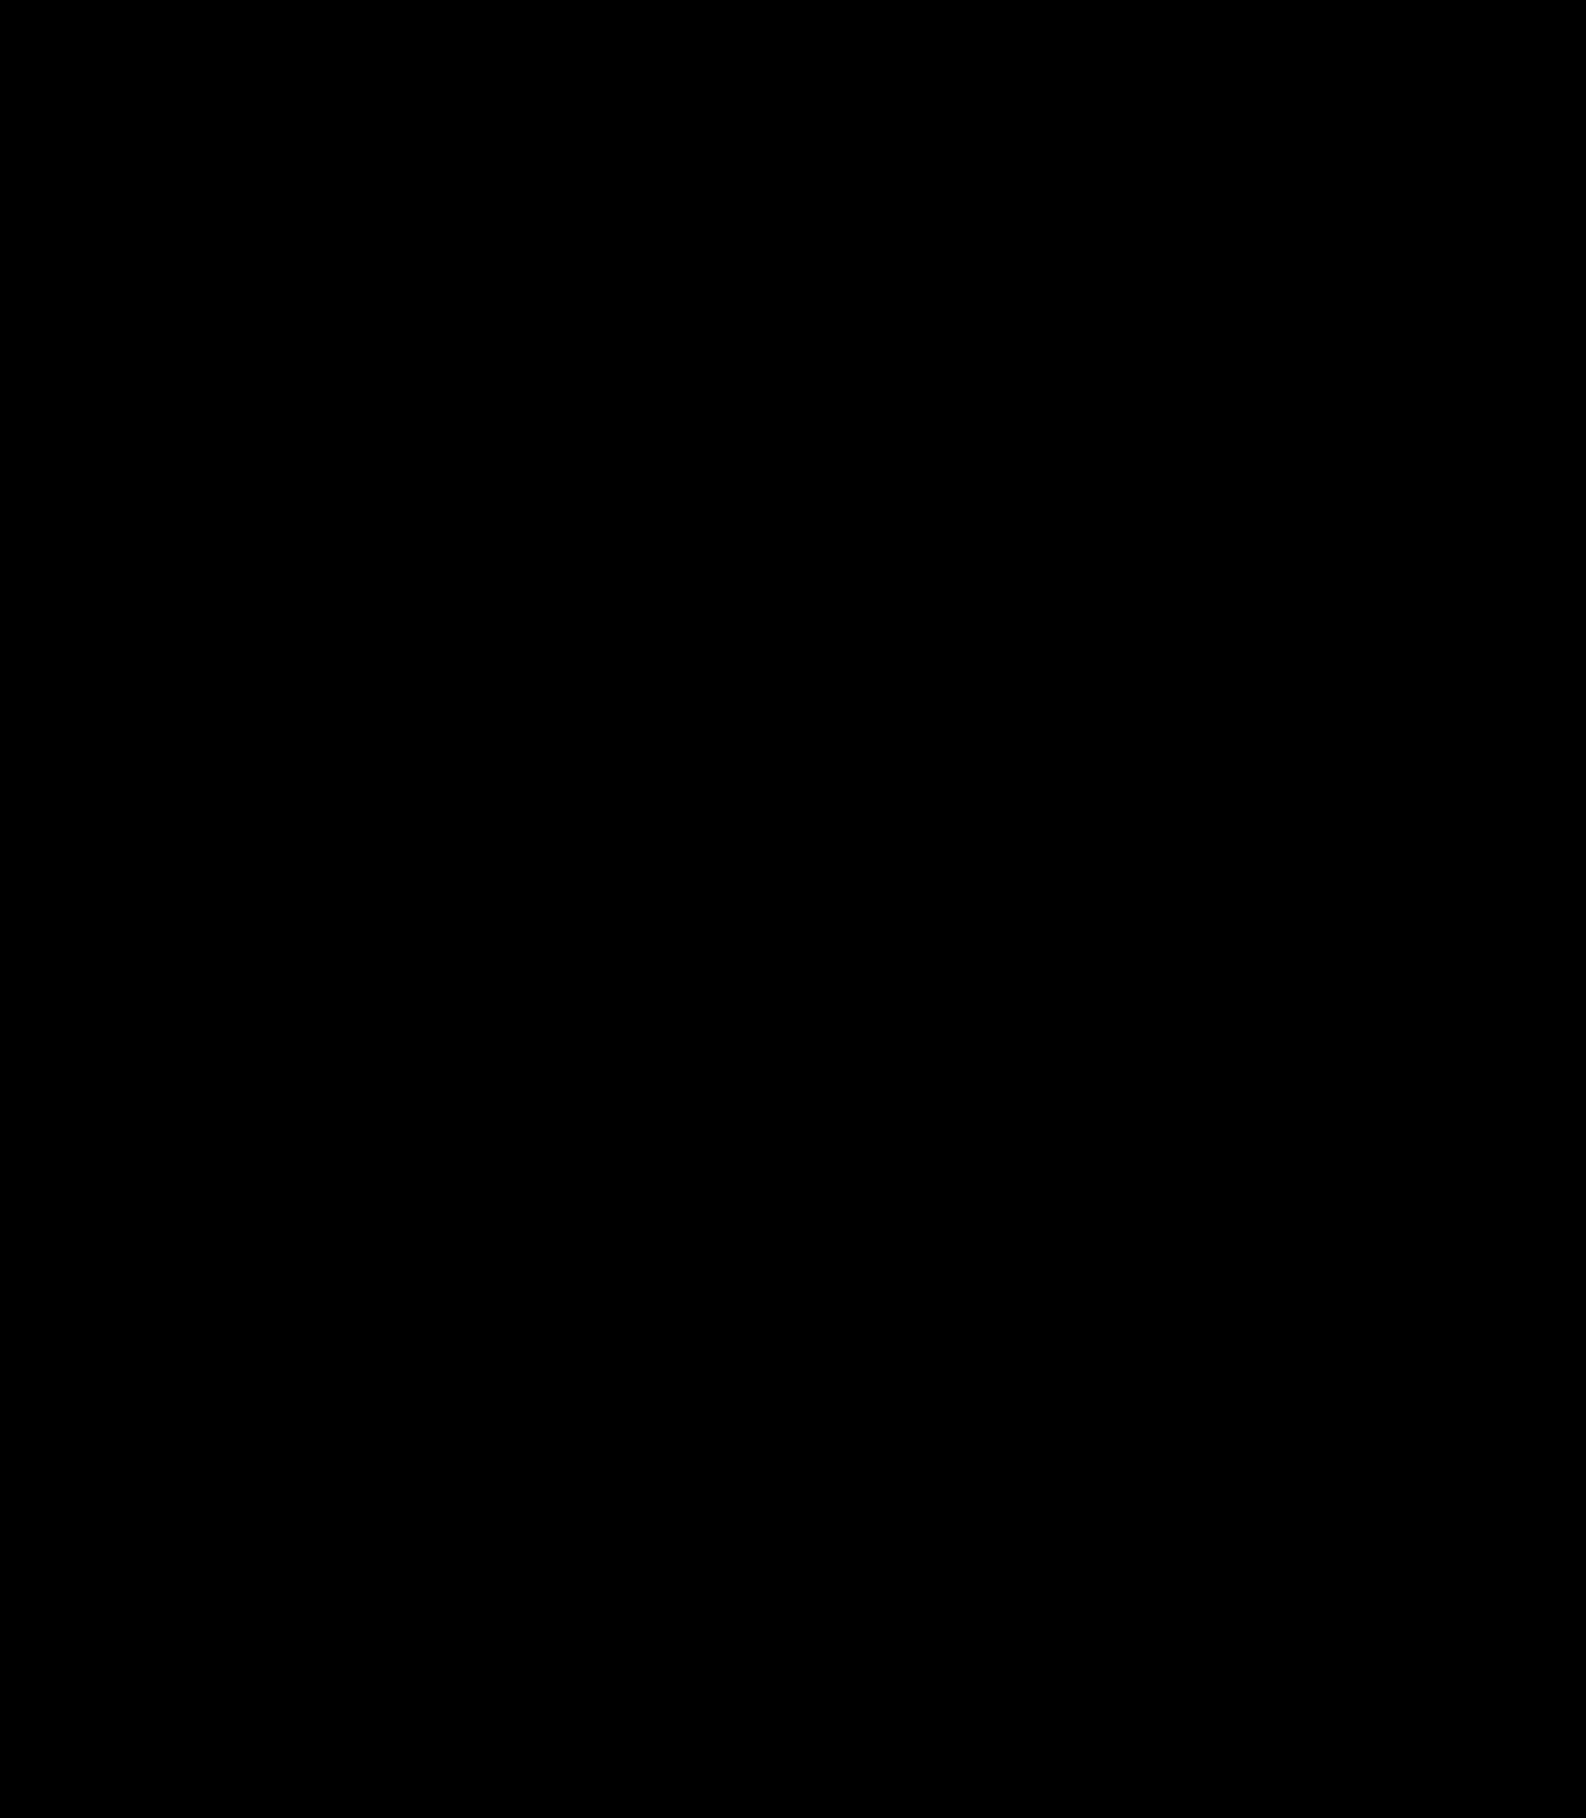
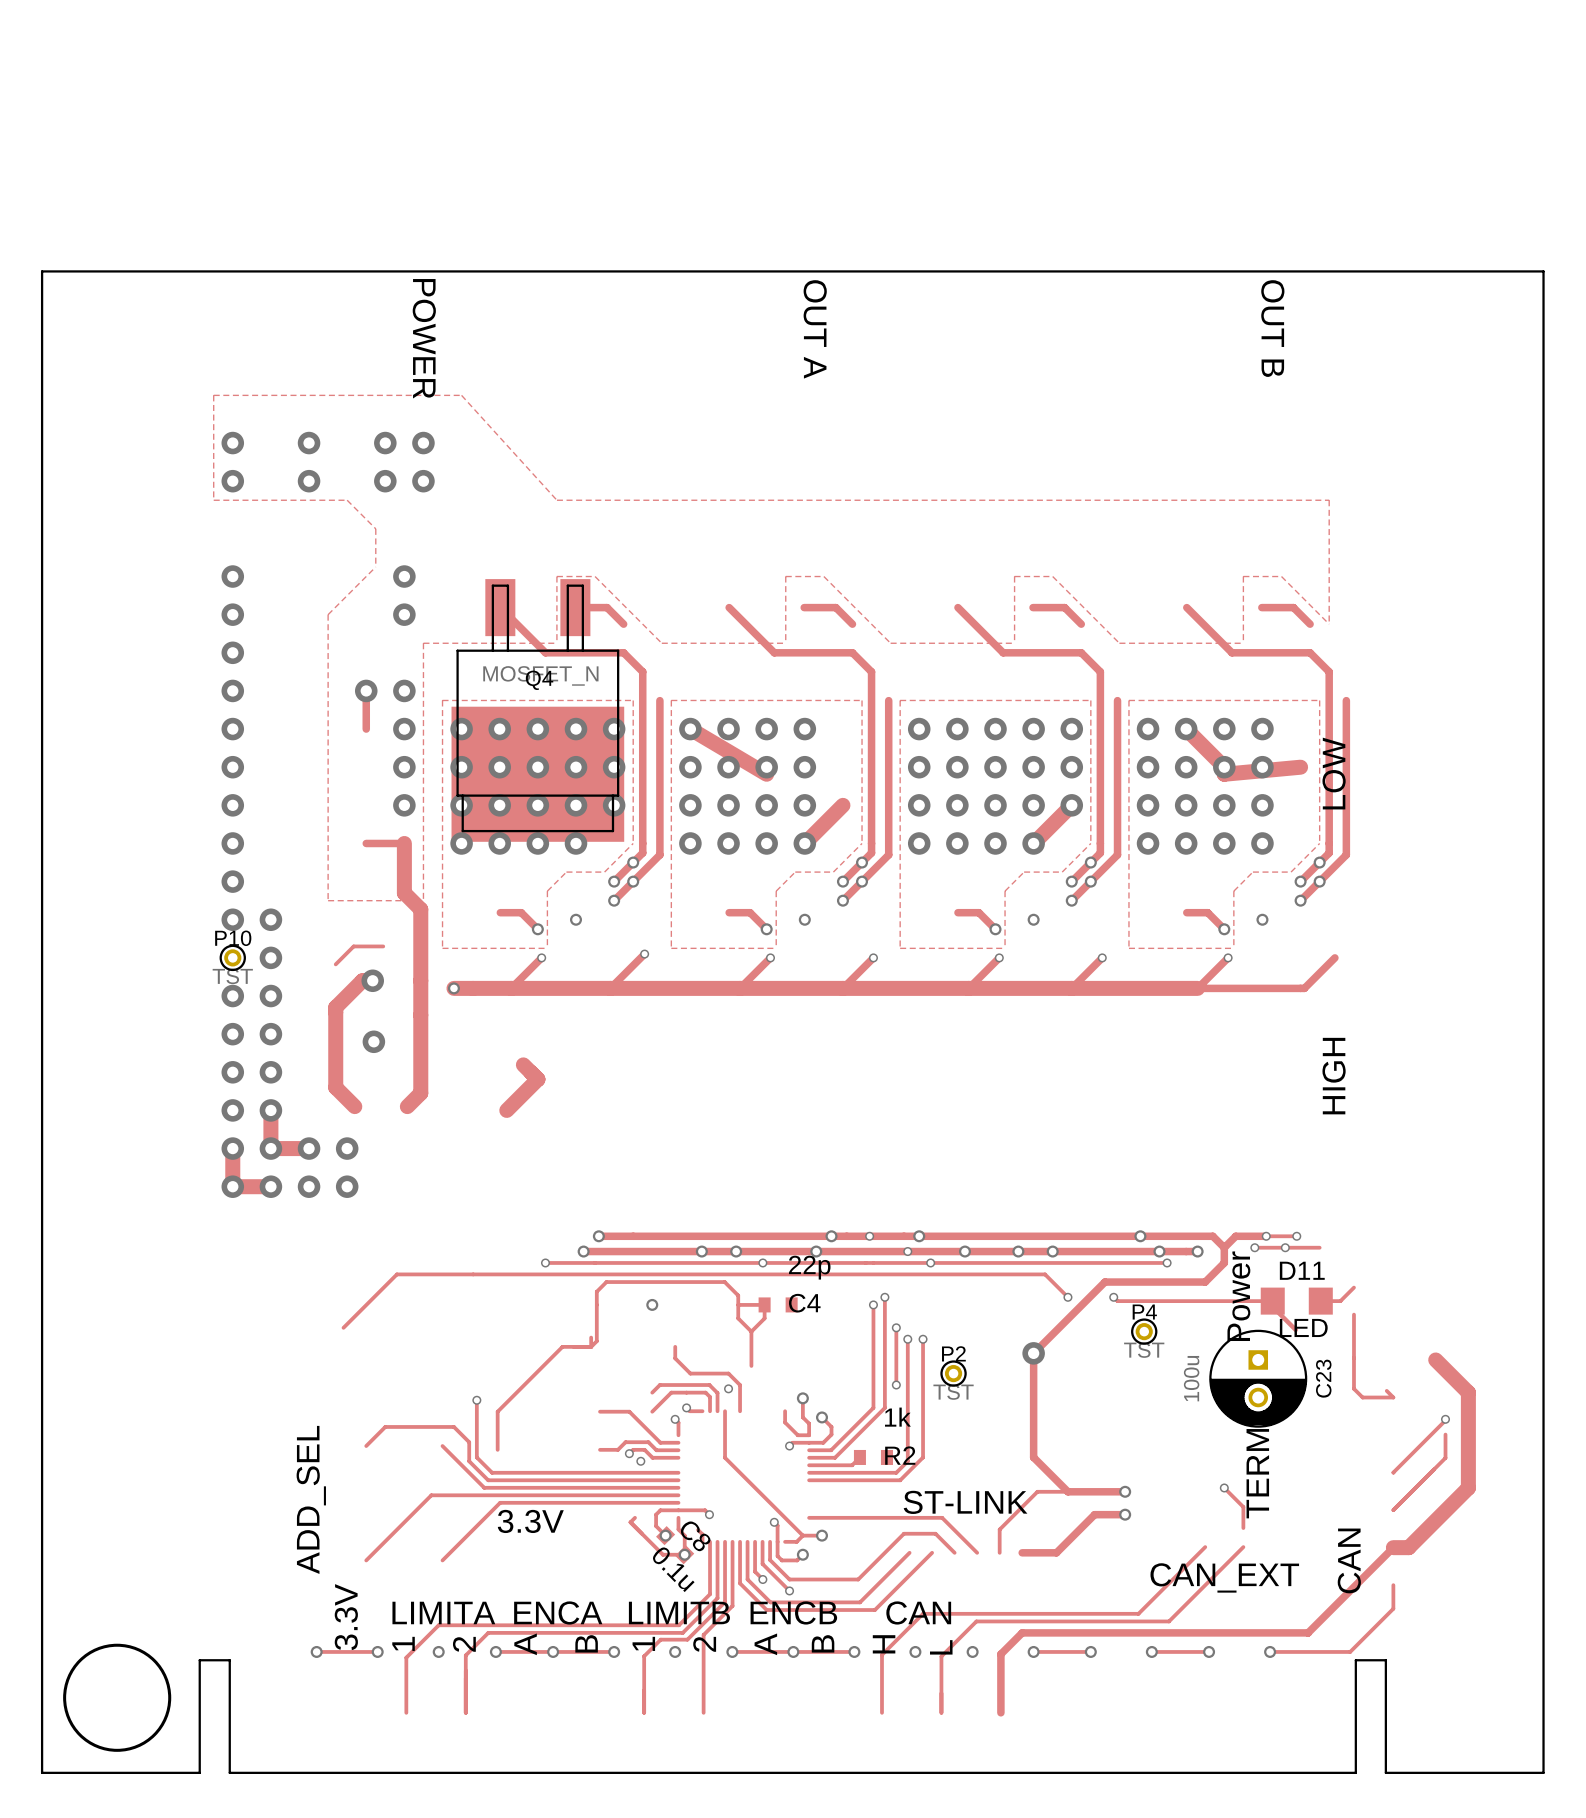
board edge: none -> (42, 271) (1543, 271) (1543, 1772) (1385, 1772) (1385, 1660) (1355, 1660) (1355, 1772) (229, 1772) (229, 1660) (199, 1660) (199, 1772) (42, 1772) (42, 271)
text: none -> OUT B (1272, 328)
text: none -> OUT A (815, 329)
text: none -> POWER (424, 338)
zone outline: none -> (213, 395) (213, 500) (347, 500) (375, 528) (375, 566) (328, 614) (328, 900) (423, 900) (423, 643) (556, 643) (556, 576) (595, 576) (661, 643) (785, 643) (785, 576) (823, 576) (890, 643) (1014, 643) (1014, 576) (1052, 576) (1119, 643) (1243, 643) (1243, 576) (1281, 576) (1329, 624) (1329, 500) (556, 500) (461, 395) (213, 395)
via: none -> (232, 443)
via: none -> (309, 443)
via: none -> (385, 443)
via: none -> (423, 443)
via: none -> (232, 481)
via: none -> (309, 481)
via: none -> (385, 481)
via: none -> (423, 481)
via: none -> (232, 576)
via: none -> (404, 576)
track: none -> (500, 607) (545, 652) (623, 652) (642, 671) (642, 853) (614, 881)
track: none -> (575, 607) (607, 607) (623, 624)
track: none -> (729, 607) (774, 652) (852, 652) (871, 671) (871, 853) (842, 881)
track: none -> (804, 607) (835, 607) (852, 624)
track: none -> (957, 607) (1003, 652) (1081, 652) (1100, 671) (1100, 853) (1071, 881)
track: none -> (1033, 607) (1064, 607) (1081, 624)
track: none -> (1186, 607) (1231, 652) (1310, 652) (1329, 671) (1329, 853) (1300, 881)
track: none -> (1261, 607) (1293, 607) (1310, 624)
via: none -> (232, 614)
via: none -> (404, 614)
via: none -> (232, 652)
via: none -> (232, 690)
track: none -> (366, 690) (366, 729)
via: none -> (366, 690)
via: none -> (404, 690)
zone outline: none -> (442, 700) (442, 948) (547, 948) (547, 891) (566, 872) (604, 872) (633, 843) (633, 700) (442, 700)
track: none -> (659, 700) (659, 854) (614, 900)
zone outline: none -> (671, 700) (862, 700) (862, 843) (833, 872) (795, 872) (776, 891) (776, 948) (671, 948) (671, 700)
track: none -> (888, 700) (888, 854) (842, 900)
zone outline: none -> (900, 700) (1090, 700) (1090, 843) (1062, 872) (1024, 872) (1005, 891) (1005, 948) (900, 948) (900, 700)
track: none -> (1117, 700) (1117, 854) (1071, 900)
zone outline: none -> (1128, 700) (1319, 700) (1319, 843) (1291, 872) (1252, 872) (1233, 891) (1233, 948) (1128, 948) (1128, 700)
track: none -> (1346, 700) (1346, 854) (1300, 900)
Q4: none -> MOSFET_N (537, 710)
via: none -> (232, 729)
via: none -> (404, 729)
via: none -> (461, 729)
via: none -> (499, 729)
via: none -> (537, 729)
via: none -> (576, 729)
via: none -> (614, 729)
track: none -> (690, 729) (766, 774)
via: none -> (690, 729)
via: none -> (728, 729)
via: none -> (766, 729)
via: none -> (804, 729)
via: none -> (919, 729)
via: none -> (957, 729)
via: none -> (995, 729)
via: none -> (1033, 729)
via: none -> (1071, 729)
via: none -> (1148, 729)
track: none -> (1186, 729) (1224, 767) (1224, 774) (1300, 767)
via: none -> (1186, 729)
via: none -> (1224, 729)
via: none -> (1262, 729)
via: none -> (232, 767)
via: none -> (404, 767)
via: none -> (461, 767)
via: none -> (499, 767)
via: none -> (537, 767)
via: none -> (576, 767)
via: none -> (614, 767)
via: none -> (690, 767)
via: none -> (728, 767)
via: none -> (766, 767)
via: none -> (804, 767)
via: none -> (919, 767)
via: none -> (957, 767)
via: none -> (995, 767)
via: none -> (1033, 767)
via: none -> (1071, 767)
via: none -> (1148, 767)
via: none -> (1186, 767)
via: none -> (1224, 767)
via: none -> (1262, 767)
text: none -> LOW (1334, 773)
via: none -> (232, 805)
via: none -> (404, 805)
via: none -> (461, 805)
via: none -> (499, 805)
via: none -> (537, 805)
via: none -> (576, 805)
via: none -> (614, 805)
via: none -> (690, 805)
via: none -> (728, 805)
via: none -> (766, 805)
via: none -> (804, 805)
track: none -> (842, 805) (804, 843)
via: none -> (919, 805)
via: none -> (957, 805)
via: none -> (995, 805)
via: none -> (1033, 805)
track: none -> (1071, 805) (1033, 843)
via: none -> (1071, 805)
via: none -> (1148, 805)
via: none -> (1186, 805)
via: none -> (1224, 805)
via: none -> (1262, 805)
via: none -> (232, 843)
track: none -> (366, 843) (404, 843) (404, 893) (420, 909) (420, 1093) (407, 1106)
via: none -> (461, 843)
via: none -> (499, 843)
via: none -> (537, 843)
via: none -> (576, 843)
via: none -> (690, 843)
via: none -> (728, 843)
via: none -> (766, 843)
via: none -> (804, 843)
via: none -> (919, 843)
via: none -> (957, 843)
via: none -> (995, 843)
via: none -> (1033, 843)
via: none -> (1148, 843)
via: none -> (1186, 843)
via: none -> (1224, 843)
via: none -> (1262, 843)
via: none -> (633, 862)
via: none -> (862, 862)
via: none -> (1090, 862)
via: none -> (1319, 862)
via: none -> (232, 881)
via: none -> (614, 881)
via: none -> (633, 881)
via: none -> (842, 881)
via: none -> (862, 881)
via: none -> (1071, 881)
via: none -> (1090, 881)
via: none -> (1300, 881)
via: none -> (1319, 881)
via: none -> (614, 900)
via: none -> (842, 900)
via: none -> (1071, 900)
via: none -> (1300, 900)
track: none -> (500, 912) (521, 912) (537, 929)
track: none -> (729, 912) (750, 912) (766, 929)
track: none -> (957, 912) (978, 912) (995, 929)
track: none -> (1186, 912) (1207, 912) (1224, 929)
via: none -> (232, 919)
via: none -> (270, 919)
via: none -> (576, 919)
via: none -> (804, 919)
via: none -> (1033, 919)
via: none -> (1262, 919)
via: none -> (537, 929)
via: none -> (766, 929)
via: none -> (995, 929)
via: none -> (1224, 929)
track: none -> (383, 946) (353, 946) (335, 964)
track: none -> (644, 954) (610, 988)
via: none -> (644, 954)
P10: none -> TST (232, 957)
via: none -> (270, 957)
track: none -> (541, 957) (511, 988)
via: none -> (541, 957)
track: none -> (770, 957) (739, 988)
via: none -> (770, 957)
track: none -> (873, 957) (842, 988)
via: none -> (873, 957)
track: none -> (999, 957) (968, 988)
via: none -> (999, 957)
track: none -> (1102, 957) (1071, 988)
via: none -> (1102, 957)
track: none -> (1228, 957) (1197, 988)
via: none -> (1228, 957)
track: none -> (1334, 957) (1304, 988) (1197, 988)
track: none -> (372, 980) (362, 980) (335, 1007) (335, 1087) (354, 1106)
via: none -> (372, 980)
track: none -> (453, 988) (1197, 988)
via: none -> (453, 988)
via: none -> (232, 996)
via: none -> (270, 996)
via: none -> (232, 1034)
via: none -> (270, 1034)
via: none -> (373, 1041)
track: none -> (523, 1064) (537, 1079) (506, 1110)
via: none -> (232, 1072)
via: none -> (270, 1072)
text: none -> HIGH (1334, 1076)
via: none -> (232, 1110)
track: none -> (270, 1110) (270, 1148) (309, 1148)
via: none -> (270, 1110)
track: none -> (232, 1148) (232, 1186) (270, 1186)
via: none -> (232, 1148)
via: none -> (270, 1148)
via: none -> (309, 1148)
via: none -> (347, 1148)
via: none -> (232, 1186)
via: none -> (270, 1186)
via: none -> (309, 1186)
via: none -> (347, 1186)
track: none -> (598, 1236) (1212, 1236) (1224, 1247)
via: none -> (598, 1236)
via: none -> (831, 1236)
via: none -> (869, 1236)
via: none -> (919, 1236)
via: none -> (1140, 1236)
via: none -> (1266, 1236)
track: none -> (1296, 1236) (1235, 1236) (1224, 1247)
via: none -> (1296, 1236)
track: none -> (1224, 1247) (1224, 1262) (1205, 1282) (1104, 1282) (1033, 1353) (1033, 1457)
track: none -> (1254, 1247) (1319, 1247)
via: none -> (1254, 1247)
via: none -> (1285, 1247)
track: none -> (583, 1251) (1197, 1251)
via: none -> (583, 1251)
via: none -> (701, 1251)
via: none -> (736, 1251)
via: none -> (816, 1251)
via: none -> (907, 1251)
via: none -> (964, 1251)
via: none -> (1018, 1251)
via: none -> (1052, 1251)
via: none -> (1159, 1251)
via: none -> (1197, 1251)
track: none -> (545, 1262) (1167, 1262)
via: none -> (545, 1262)
via: none -> (762, 1262)
via: none -> (930, 1262)
via: none -> (1167, 1262)
track: none -> (1353, 1287) (1340, 1301) (1320, 1301)
text: none -> Power (1238, 1296)
track: none -> (884, 1297) (884, 1407) (835, 1457) (809, 1457)
via: none -> (884, 1297)
track: none -> (1067, 1297) (1045, 1274) (396, 1274) (343, 1327)
via: none -> (1067, 1297)
track: none -> (1113, 1297) (1117, 1301) (1272, 1301) (1272, 1306) (1295, 1329)
via: none -> (1113, 1297)
D11: none -> LED (1296, 1301)
via: none -> (652, 1304)
track: none -> (738, 1304) (764, 1304) (764, 1318) (751, 1331)
C4: none -> 22p (778, 1304)
track: none -> (873, 1304) (873, 1407) (831, 1450) (809, 1450)
via: none -> (873, 1304)
track: none -> (1353, 1314) (1353, 1388) (1362, 1397) (1393, 1397) (1386, 1390)
track: none -> (896, 1327) (896, 1385)
via: none -> (896, 1327)
track: none -> (751, 1331) (738, 1318) (738, 1295) (724, 1282) (606, 1282) (596, 1291) (596, 1341) (591, 1346)
track: none -> (751, 1331) (751, 1365)
P4: none -> TST (1144, 1331)
track: none -> (591, 1337) (591, 1346)
track: none -> (907, 1339) (907, 1461) (896, 1472) (809, 1472)
via: none -> (907, 1339)
track: none -> (923, 1339) (923, 1457) (900, 1480) (809, 1480)
via: none -> (923, 1339)
track: none -> (591, 1346) (562, 1346) (497, 1411) (497, 1449)
track: none -> (675, 1346) (675, 1358) (690, 1373) (728, 1373) (740, 1385) (740, 1411)
via: none -> (1033, 1353)
track: none -> (1435, 1359) (1468, 1392) (1468, 1487) (1408, 1547) (1393, 1547) (1308, 1632)
P2: none -> TST (953, 1373)
C23: none -> 100u (1258, 1378)
via: none -> (896, 1385)
via: none -> (728, 1388)
track: none -> (652, 1392) (659, 1385) (709, 1385) (717, 1393) (717, 1411)
track: none -> (802, 1398) (802, 1417) (809, 1423) (809, 1435) (797, 1435) (785, 1422) (785, 1411)
via: none -> (802, 1398)
track: none -> (476, 1400) (476, 1457) (492, 1472) (678, 1472)
via: none -> (476, 1400)
track: none -> (686, 1407) (689, 1411) (702, 1411)
via: none -> (686, 1407)
track: none -> (600, 1411) (629, 1411) (660, 1442) (678, 1442)
track: none -> (710, 1411) (710, 1396) (705, 1392) (671, 1392) (652, 1411)
track: none -> (725, 1411) (725, 1457) (802, 1535)
track: none -> (822, 1417) (831, 1426) (831, 1434) (823, 1442) (792, 1442) (789, 1446)
via: none -> (822, 1417)
track: none -> (675, 1419) (678, 1422) (678, 1435)
via: none -> (675, 1419)
track: none -> (1445, 1419) (1393, 1472)
via: none -> (1445, 1419)
track: none -> (1445, 1434) (1445, 1457) (1393, 1510)
track: none -> (366, 1446) (385, 1426) (453, 1426) (469, 1442) (469, 1461) (488, 1480) (678, 1480)
track: none -> (442, 1446) (484, 1487) (678, 1487)
via: none -> (789, 1446)
track: none -> (600, 1449) (617, 1449) (625, 1442) (648, 1442) (656, 1450) (678, 1450)
track: none -> (629, 1453) (633, 1449) (644, 1449) (652, 1457) (678, 1457)
via: none -> (629, 1453)
track: none -> (859, 1457) (852, 1465) (809, 1465)
R2: none -> 1k (873, 1457)
track: none -> (1033, 1457) (1067, 1491)
via: none -> (640, 1461)
text: none -> TERM (1257, 1473)
track: none -> (1224, 1487) (1243, 1507) (1243, 1528)
via: none -> (1224, 1487)
track: none -> (1067, 1491) (1037, 1491) (999, 1529) (999, 1552)
track: none -> (1067, 1491) (1125, 1491)
via: none -> (1125, 1491)
track: none -> (678, 1495) (431, 1495) (366, 1560)
text: none -> ADD_SEL (311, 1499)
track: none -> (678, 1502) (500, 1502) (442, 1560)
text: none -> ST-LINK (965, 1502)
track: none -> (709, 1514) (705, 1510) (660, 1510) (656, 1514) (656, 1526) (665, 1535)
via: none -> (709, 1514)
track: none -> (1125, 1514) (1094, 1514) (1056, 1552) (1022, 1552)
via: none -> (1125, 1514)
track: none -> (635, 1517) (630, 1522) (662, 1554) (684, 1554) (684, 1535) (678, 1529) (678, 1517)
track: none -> (809, 1517) (942, 1517) (977, 1552)
text: none -> 3.3V (530, 1521)
track: none -> (774, 1522) (777, 1525) (777, 1556) (781, 1560) (797, 1560) (802, 1554)
via: none -> (774, 1522)
track: none -> (698, 1529) (702, 1534) (702, 1541)
via: none -> (665, 1535)
track: none -> (802, 1535) (796, 1541) (785, 1541)
track: none -> (802, 1535) (822, 1535)
via: none -> (822, 1535)
track: none -> (710, 1541) (710, 1594) (678, 1625) (438, 1625) (406, 1657) (406, 1712)
track: none -> (717, 1541) (717, 1598) (682, 1632) (488, 1632) (465, 1655) (465, 1712)
track: none -> (725, 1541) (725, 1602) (687, 1639) (660, 1639) (644, 1656) (644, 1712)
track: none -> (732, 1541) (732, 1606) (703, 1634) (703, 1712)
track: none -> (740, 1541) (740, 1583) (766, 1610) (874, 1610) (932, 1552)
track: none -> (747, 1541) (747, 1579) (770, 1602) (860, 1602) (909, 1552)
track: none -> (755, 1541) (755, 1571) (762, 1579)
track: none -> (762, 1541) (762, 1563) (789, 1590)
track: none -> (770, 1541) (770, 1560) (789, 1579) (858, 1579) (903, 1533) (935, 1533) (954, 1552)
C8: none -> 0.1u (675, 1545)
track: none -> (1205, 1547) (1138, 1613) (923, 1613) (881, 1654) (881, 1712)
track: none -> (1243, 1547) (1169, 1621) (976, 1621) (941, 1656) (941, 1712)
via: none -> (684, 1554)
via: none -> (802, 1554)
text: none -> CAN (1349, 1560)
text: none -> CAN_EXT (1224, 1577)
via: none -> (762, 1579)
track: none -> (1393, 1585) (1393, 1608) (1350, 1651) (1270, 1651)
via: none -> (789, 1590)
text: none -> LIMITA (443, 1612)
text: none -> LIMITB (679, 1612)
text: none -> ENCA (558, 1612)
text: none -> ENCB (793, 1612)
text: none -> CAN (918, 1612)
text: none -> 3.3V (346, 1617)
track: none -> (1308, 1632) (1022, 1632) (1000, 1654) (1000, 1712)
drawing: none -> [63, 1643, 172, 1752]
text: none -> B (586, 1643)
text: none -> B (823, 1643)
text: none -> 1 (403, 1643)
text: none -> 2 (464, 1644)
text: none -> A (525, 1644)
text: none -> 1 (643, 1643)
text: none -> 2 (704, 1644)
text: none -> A (765, 1644)
text: none -> H (884, 1644)
text: none -> L (941, 1647)
track: none -> (316, 1651) (377, 1651)
via: none -> (316, 1651)
via: none -> (377, 1651)
via: none -> (438, 1651)
track: none -> (495, 1651) (614, 1651)
via: none -> (495, 1651)
via: none -> (553, 1651)
via: none -> (614, 1651)
via: none -> (675, 1651)
track: none -> (732, 1651) (854, 1651)
via: none -> (732, 1651)
via: none -> (793, 1651)
via: none -> (854, 1651)
via: none -> (915, 1651)
via: none -> (972, 1651)
track: none -> (1033, 1651) (1090, 1651)
via: none -> (1033, 1651)
via: none -> (1090, 1651)
track: none -> (1151, 1651) (1209, 1651)
via: none -> (1151, 1651)
via: none -> (1209, 1651)
via: none -> (1270, 1651)

